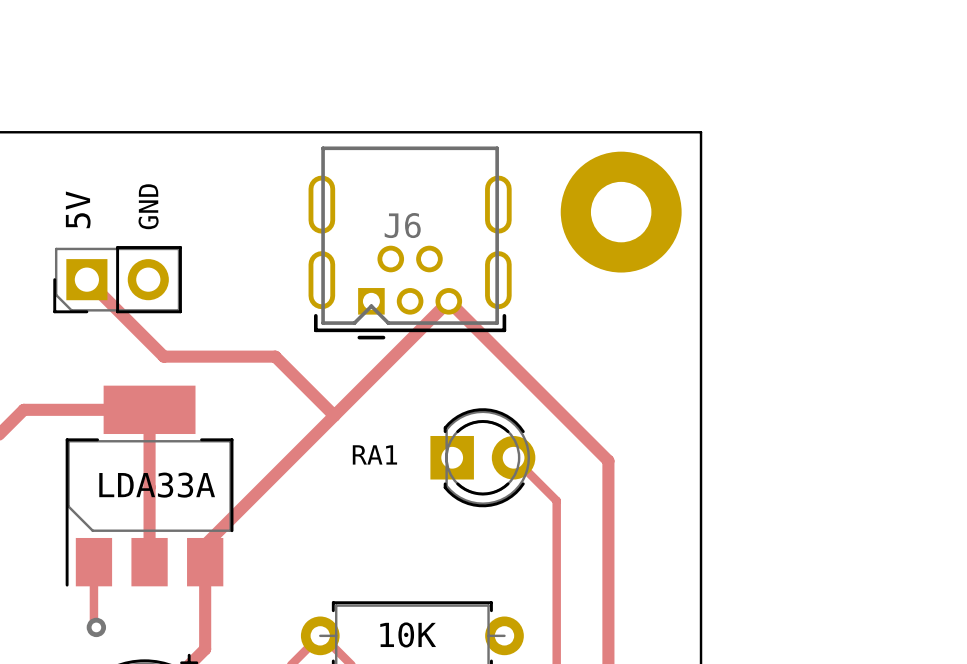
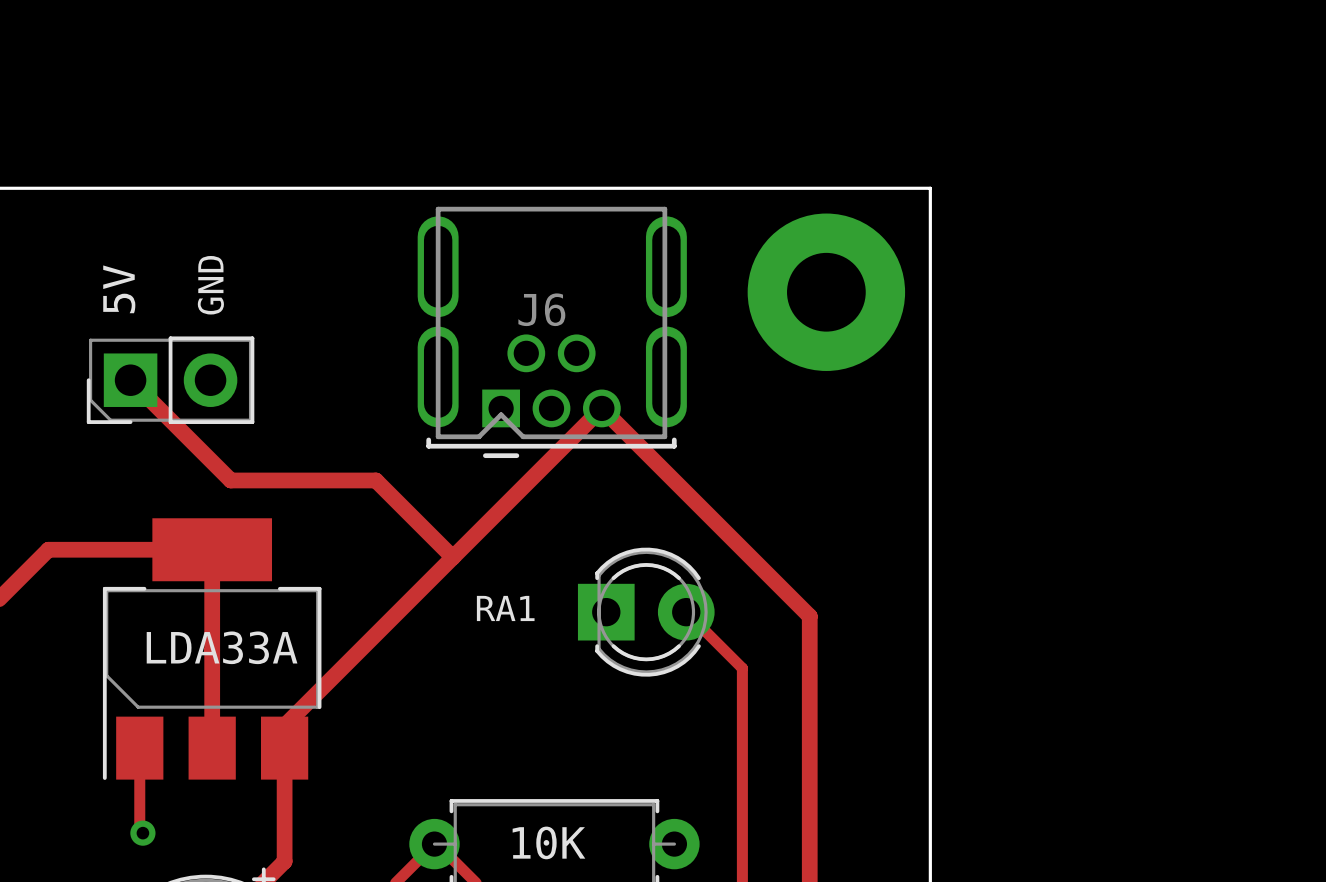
J6 footprint: [308, 146, 512, 340] -> [417, 206, 687, 459]

